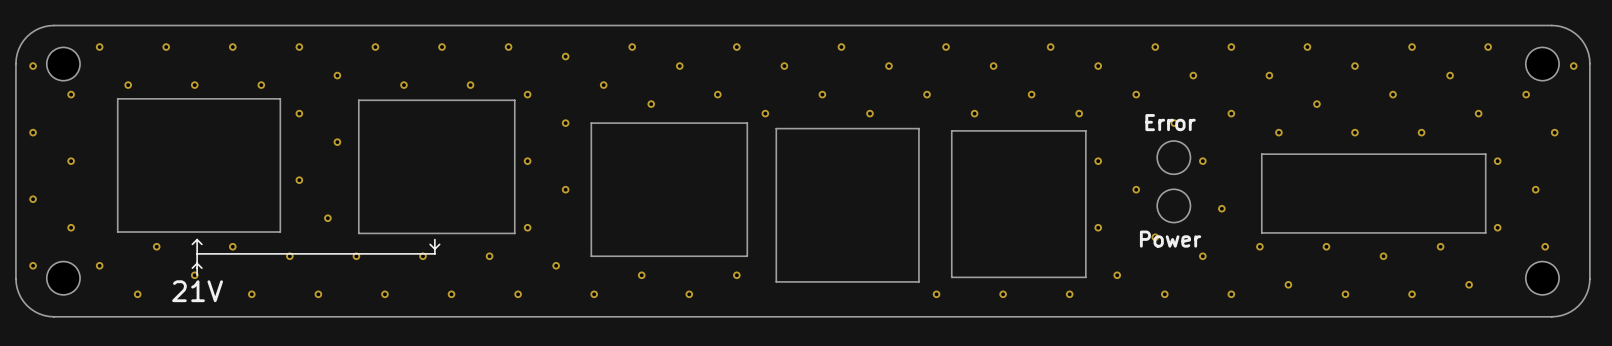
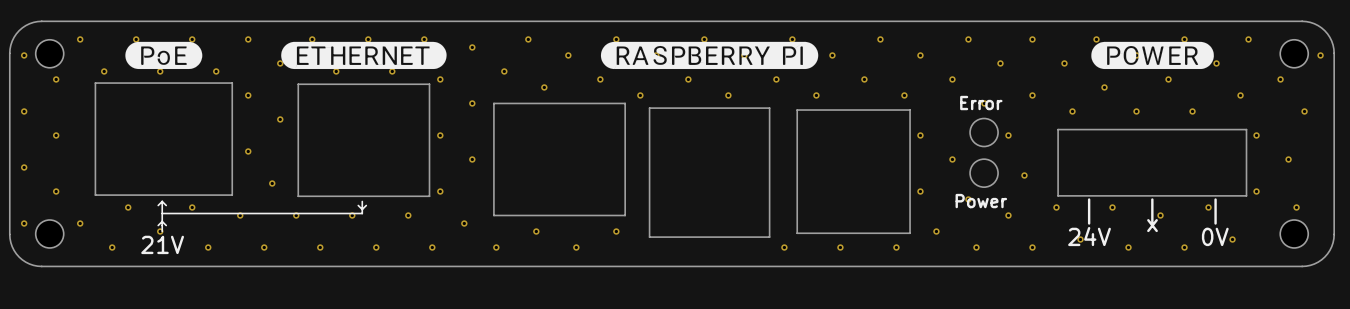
drawing: none -> [125, 41, 203, 70]
drawing: none -> [281, 41, 447, 70]
drawing: none -> [600, 41, 819, 70]
drawing: none -> [1091, 41, 1214, 70]
line: none -> (1089, 199) (1089, 223)
line: none -> (1152, 199) (1152, 223)
line: none -> (1215, 199) (1215, 223)
text: none -> x (1152, 225)
text: none -> 24V (1089, 236)
text: none -> 0V (1215, 236)

